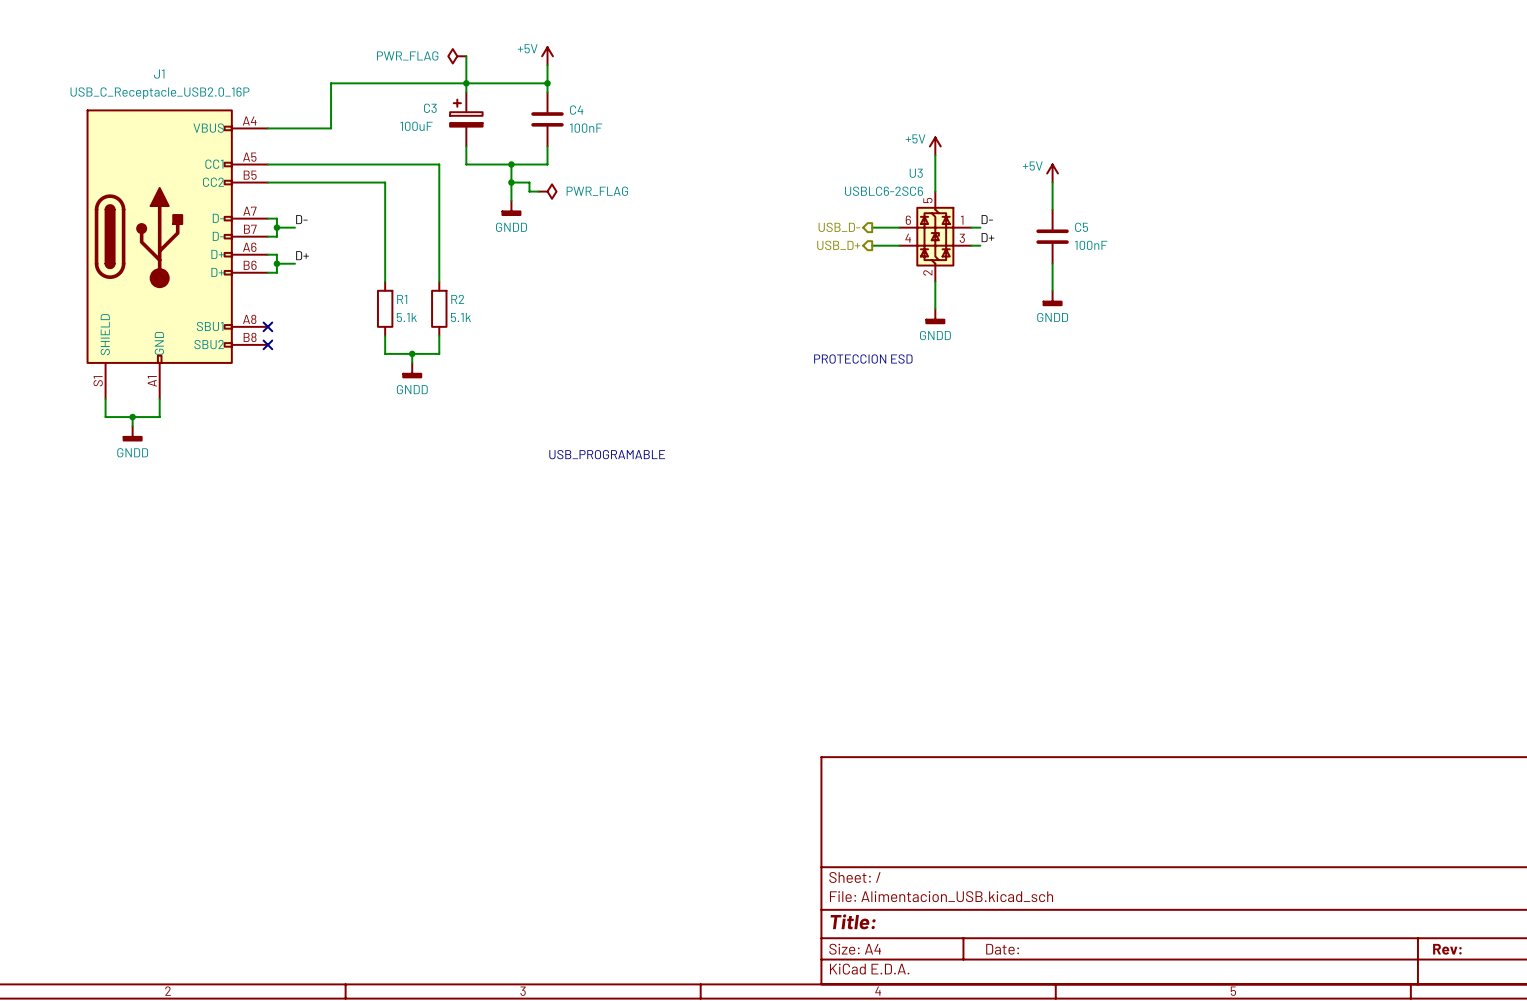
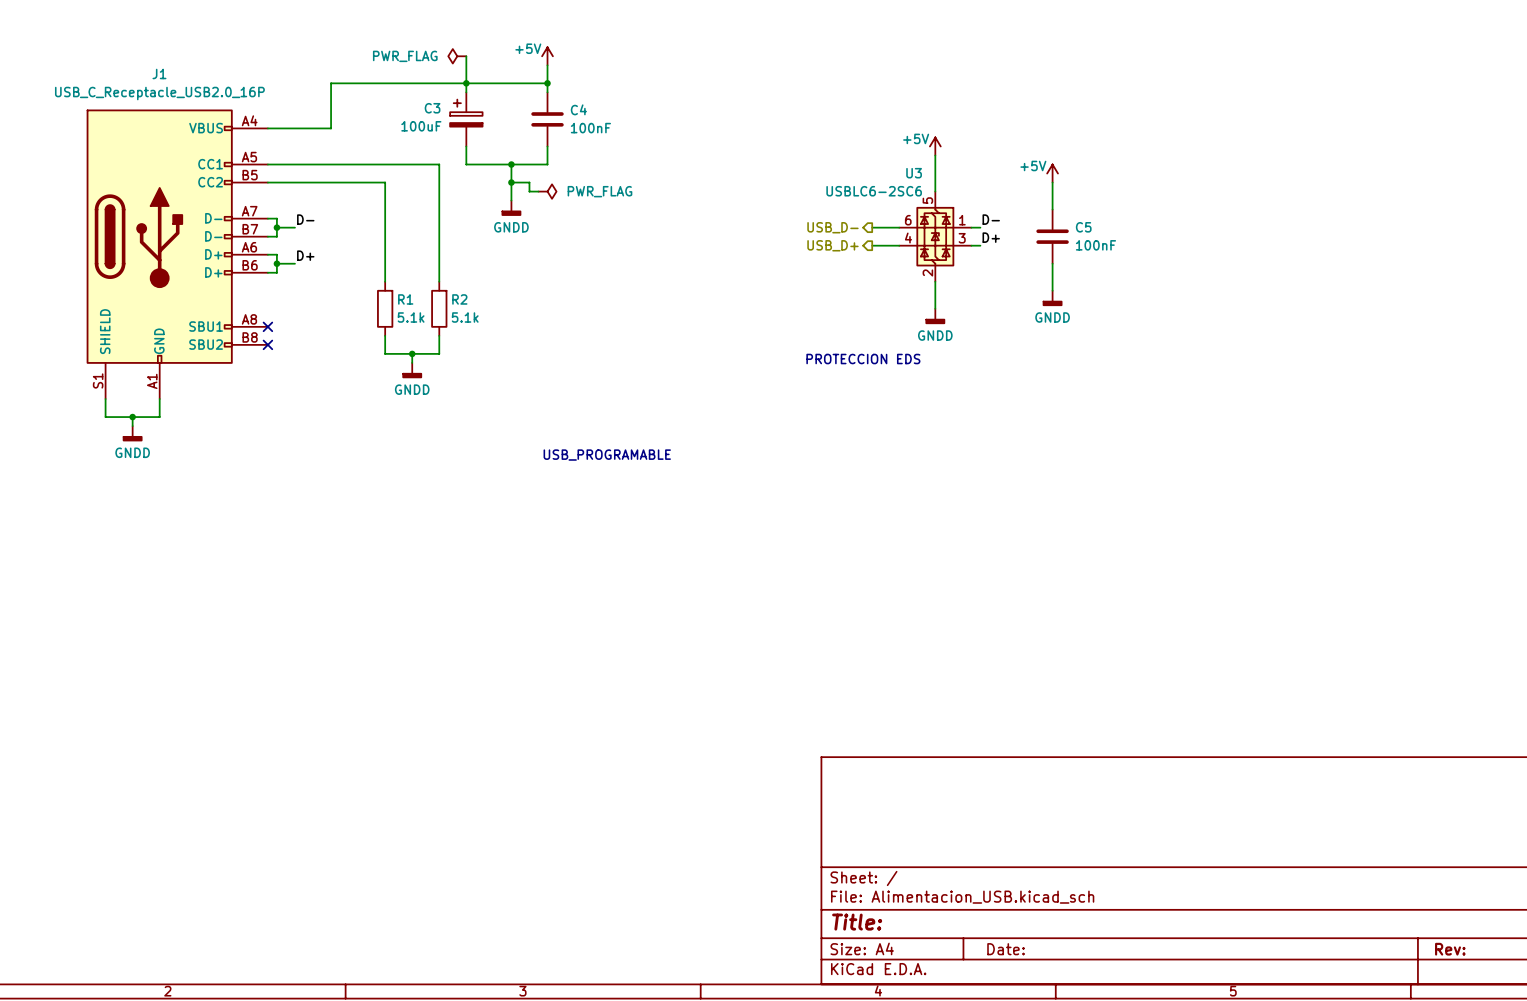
text: PROTECCION ESD (863, 359) -> PROTECCION EDS (863, 359)

